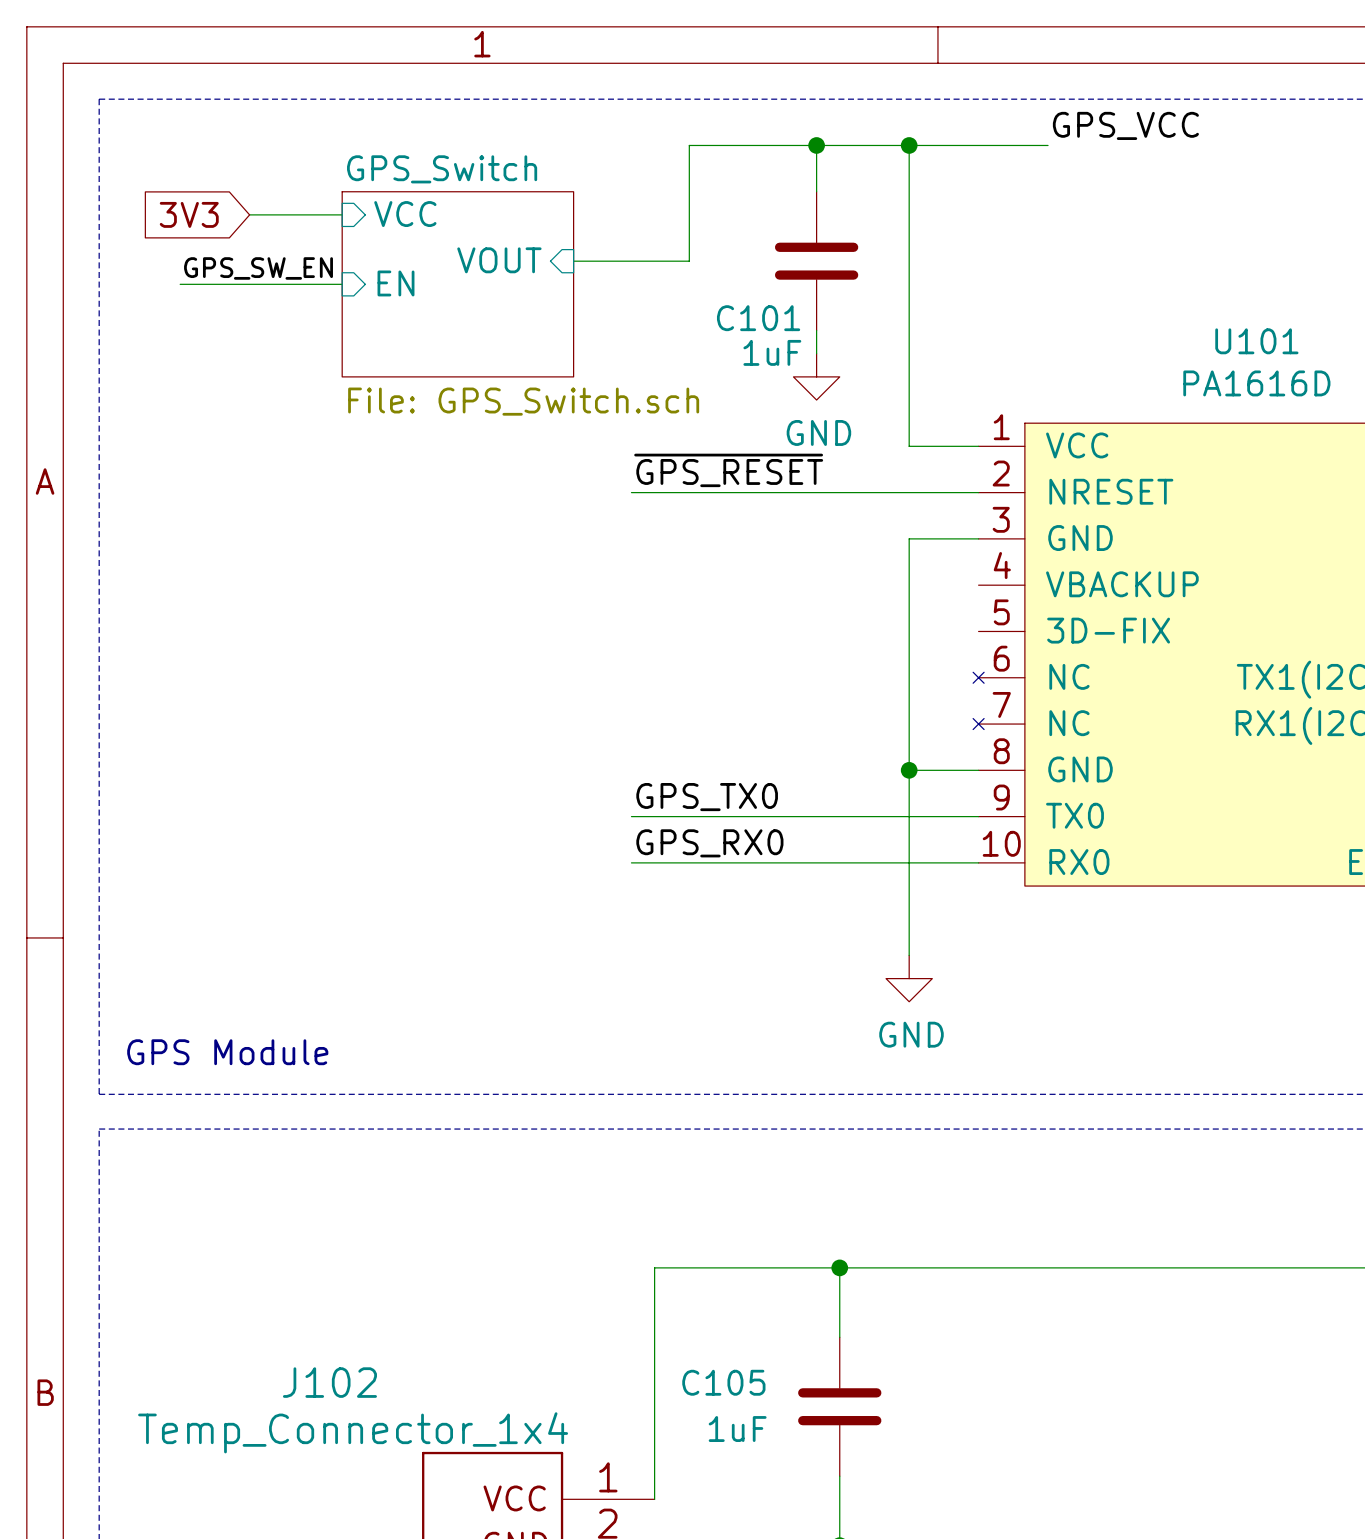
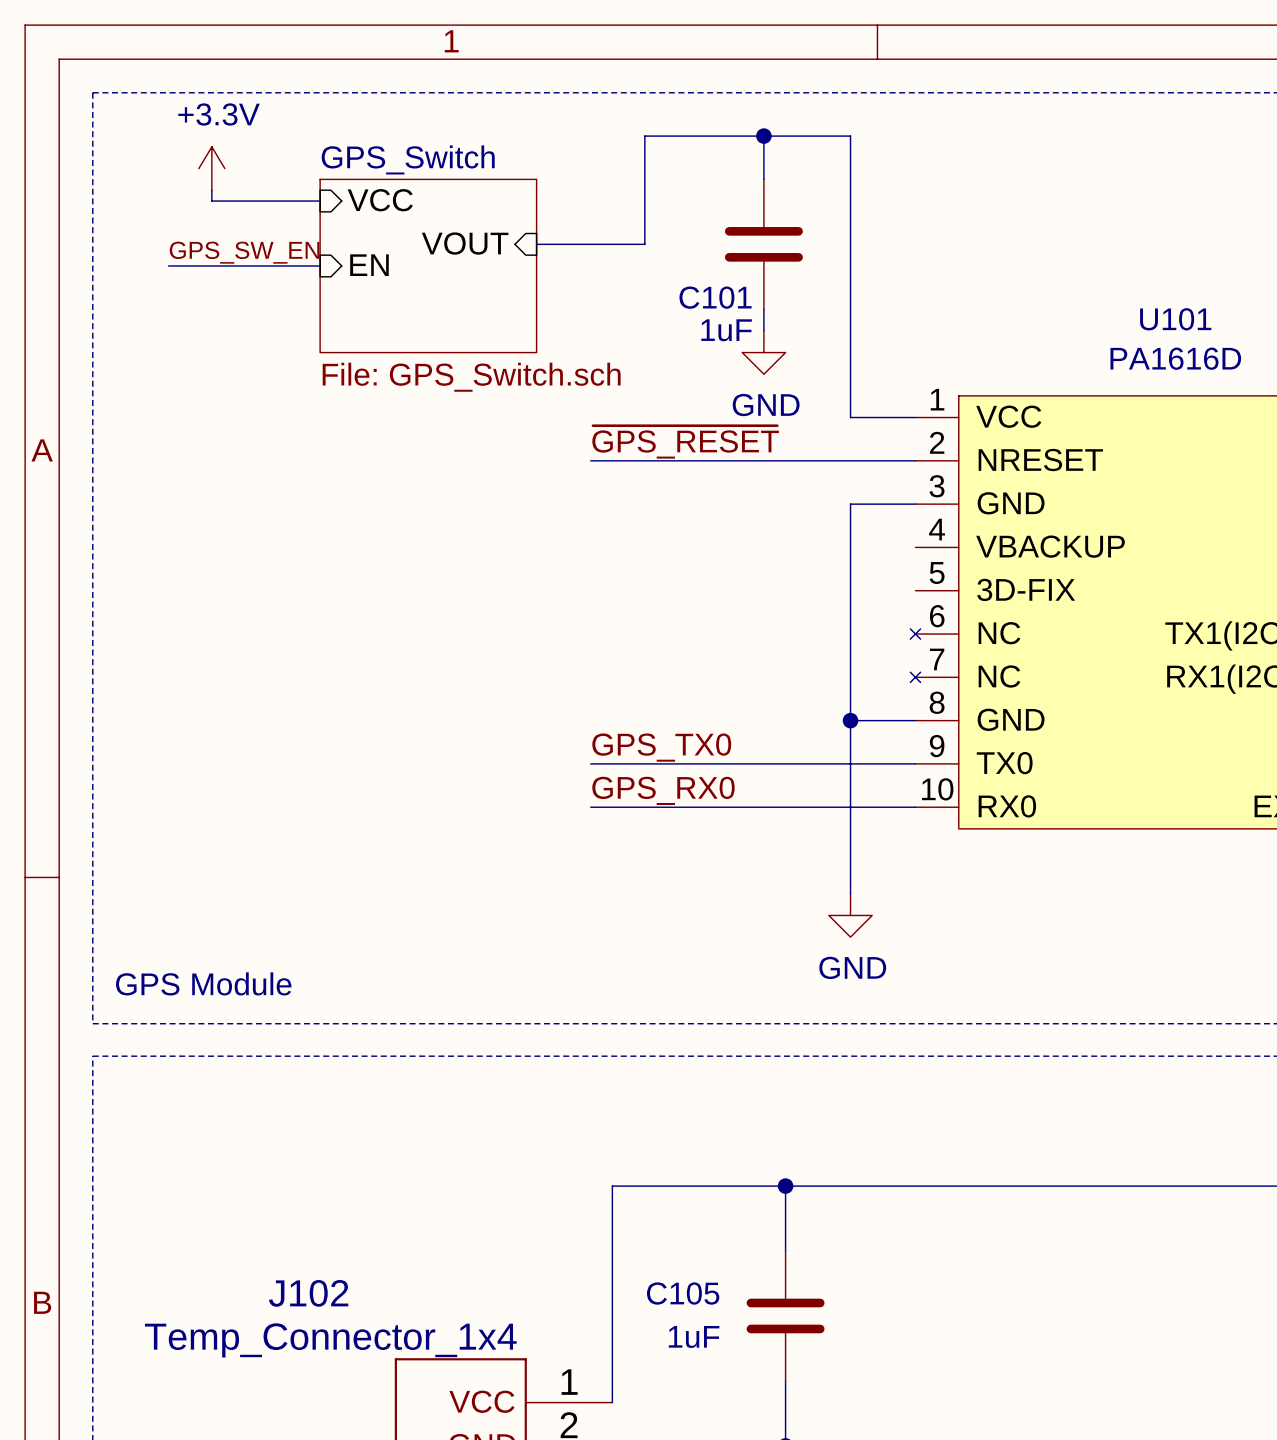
label: GPS_VCC (1125, 125) -> none
wire: (909, 145) (1048, 145) -> none
junction: (909, 145) -> none
power symbol: none -> +3.3V (211, 168)
wire: none -> (211, 190) (211, 201) (233, 201)
global label: 3V3 (189, 214) -> none

